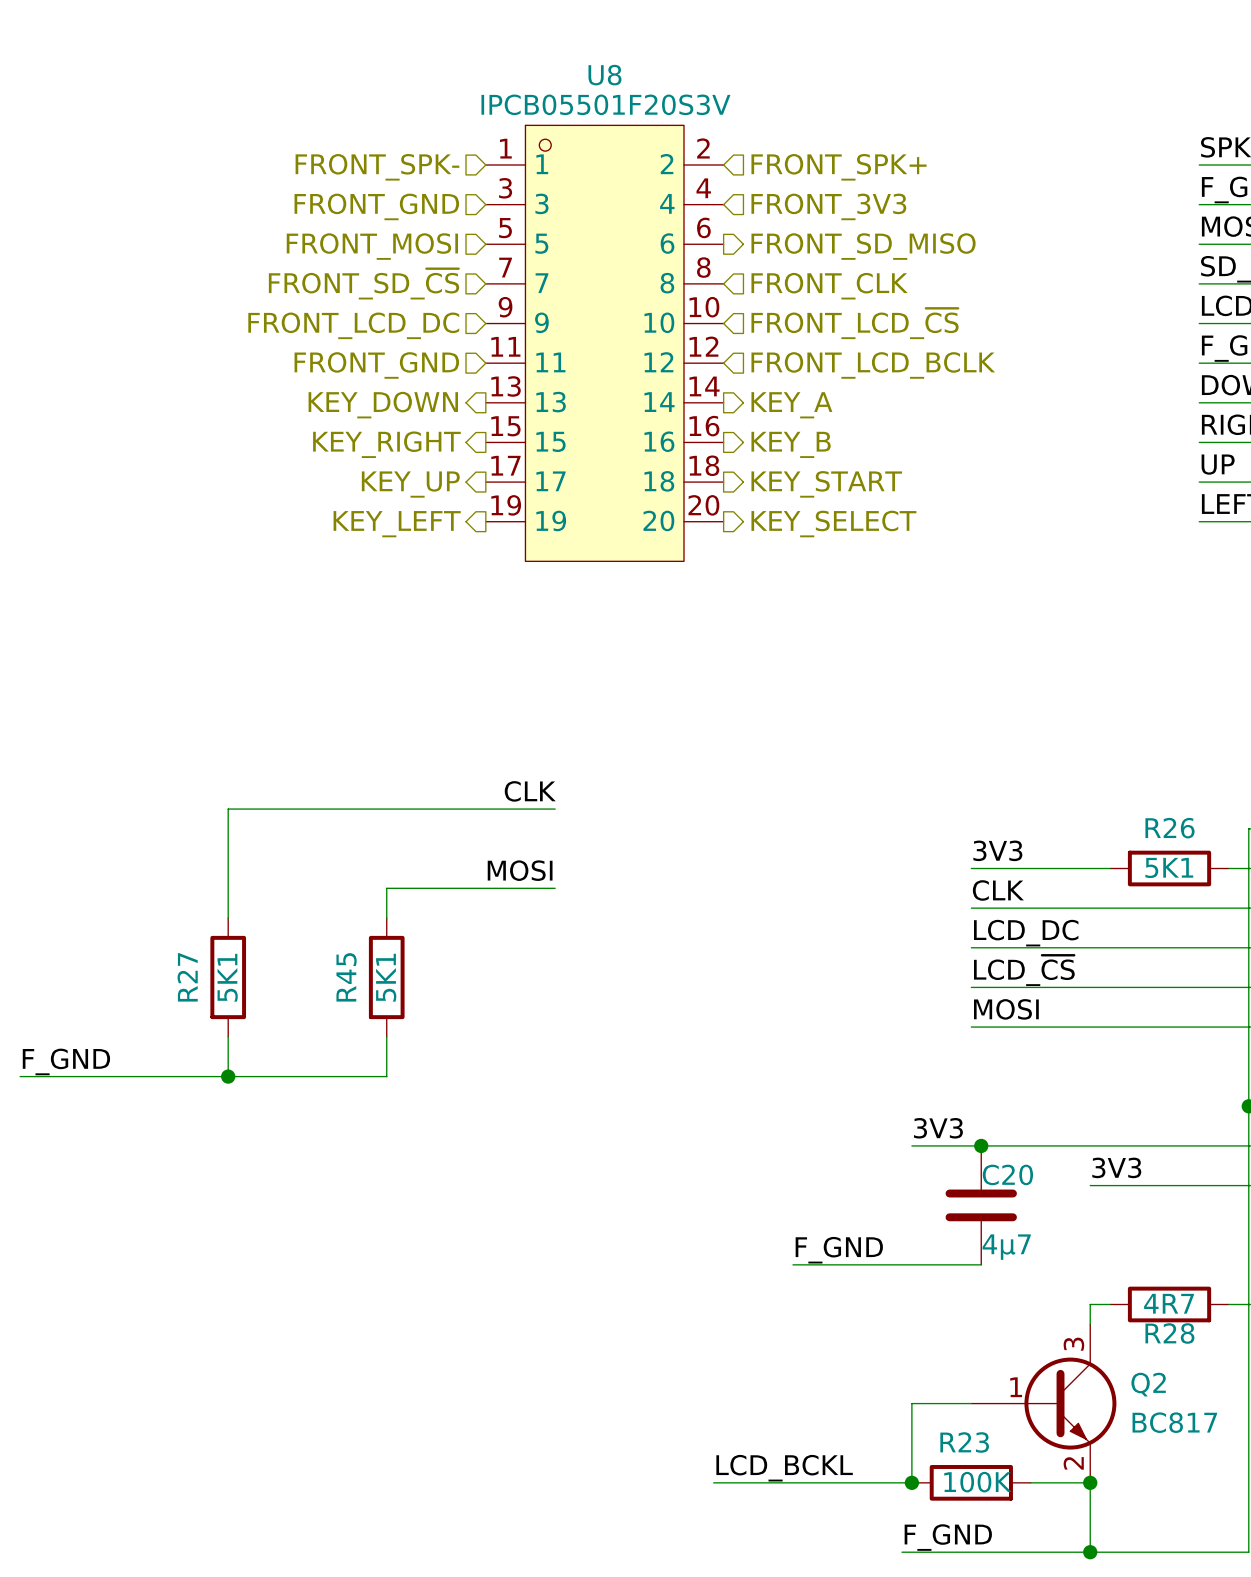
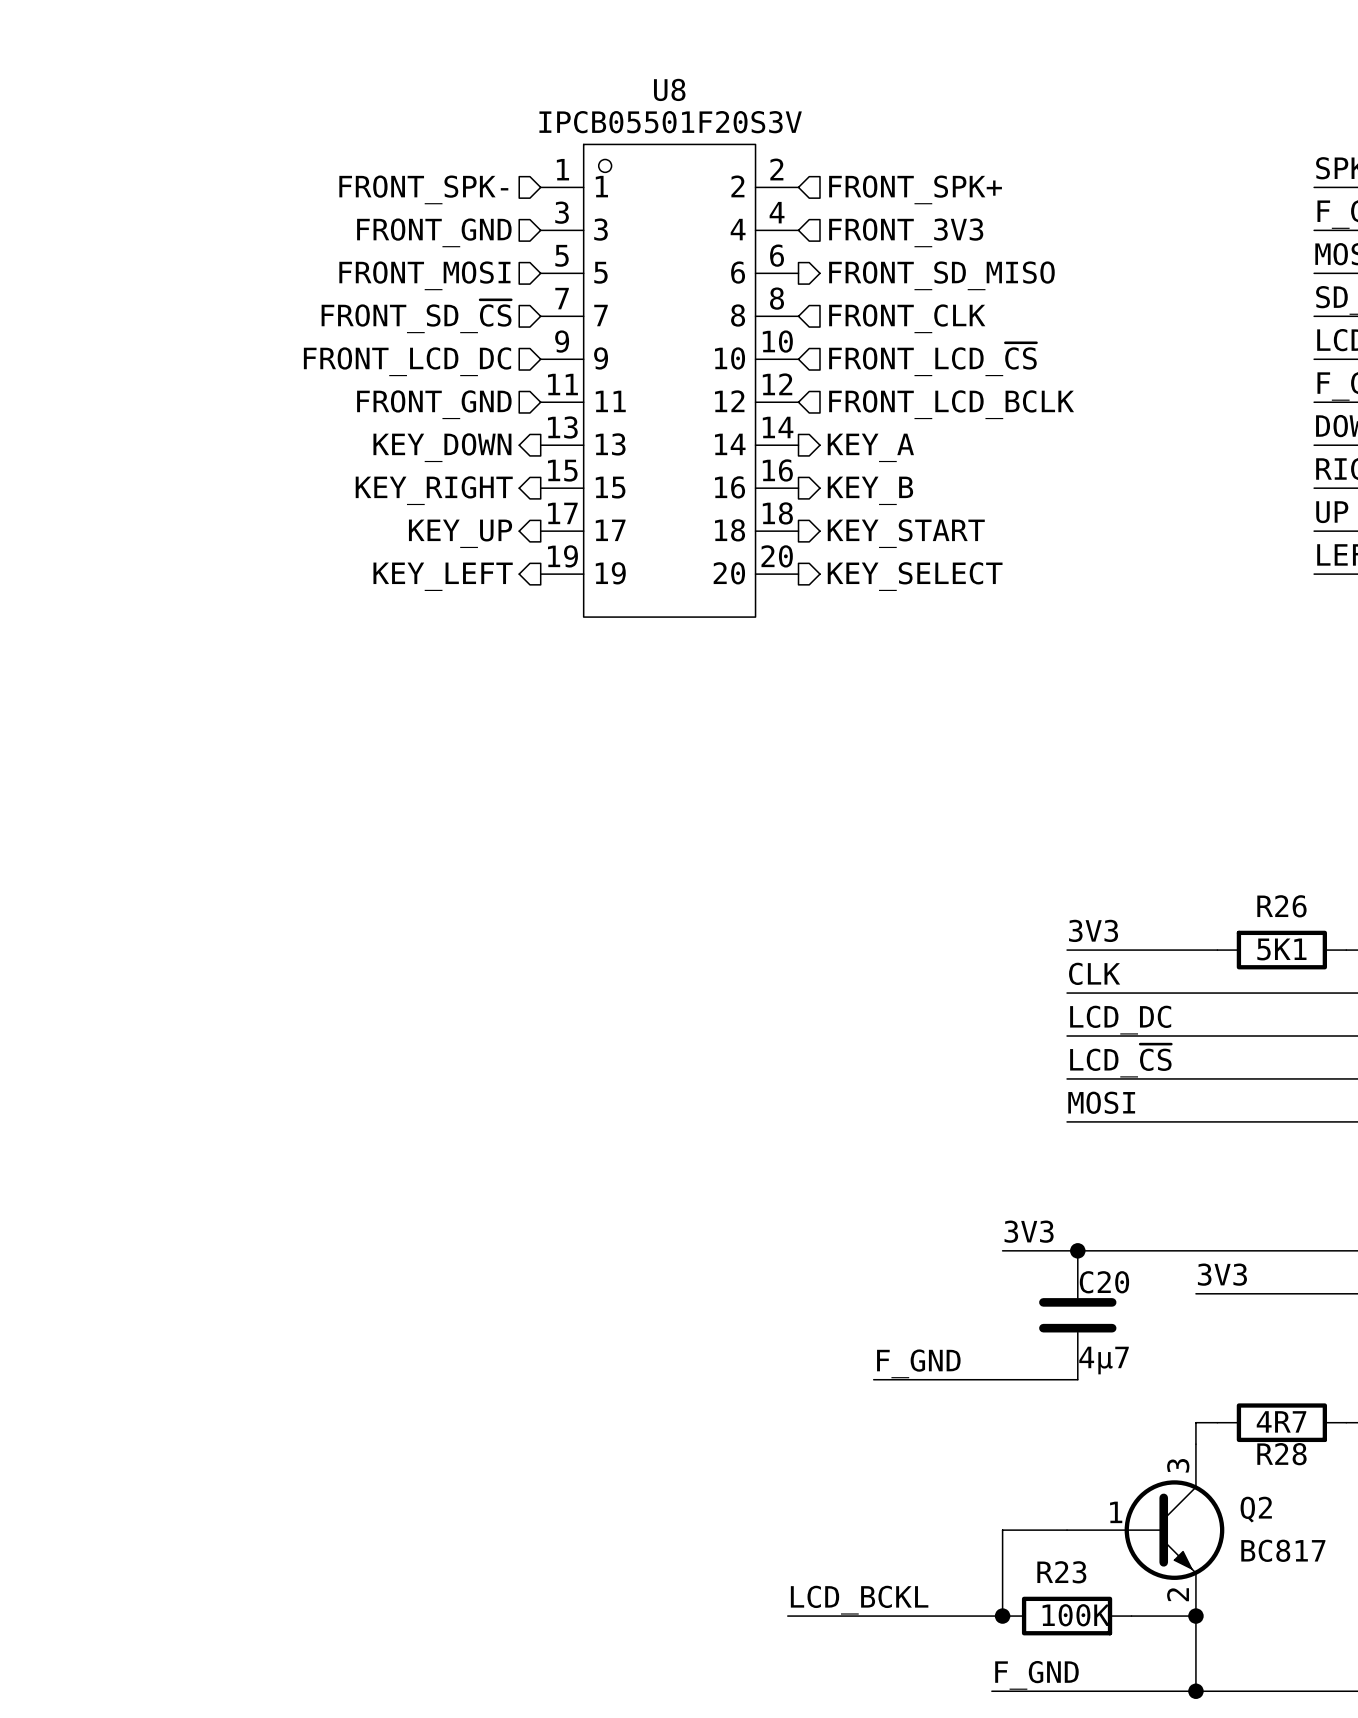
label: CLK (530, 791) -> none
wire: (555, 809) (228, 809) (228, 918) -> none
label: MOSI (520, 870) -> none
wire: (555, 888) (386, 888) (386, 918) -> none
R27: 5K1 (228, 977) -> none
R45: 5K1 (386, 977) -> none
wire: (228, 1036) (228, 1076) -> none
wire: (386, 1036) (386, 1076) (20, 1076) -> none
label: F_GND (66, 1061) -> none
junction: (228, 1076) -> none

